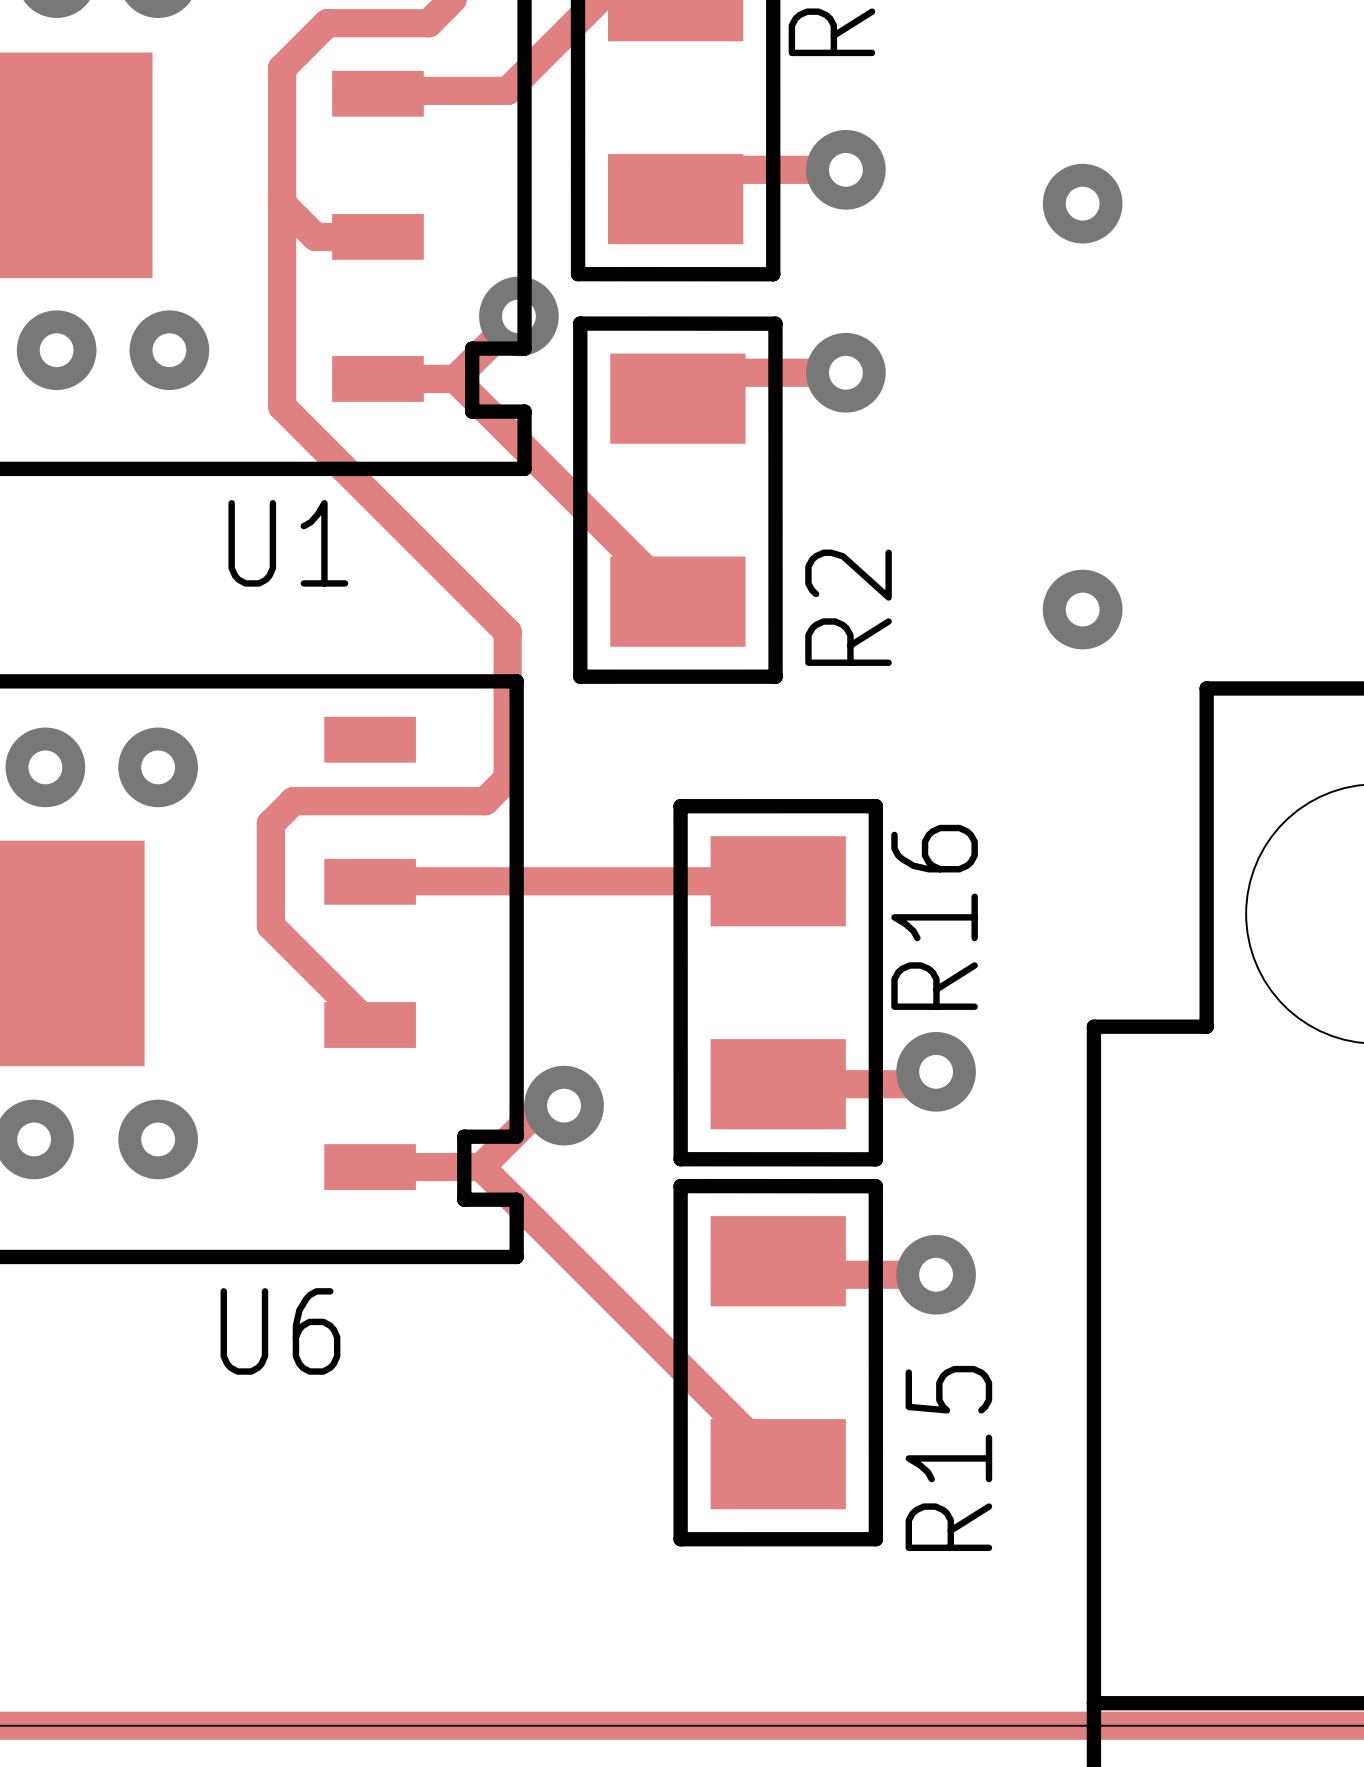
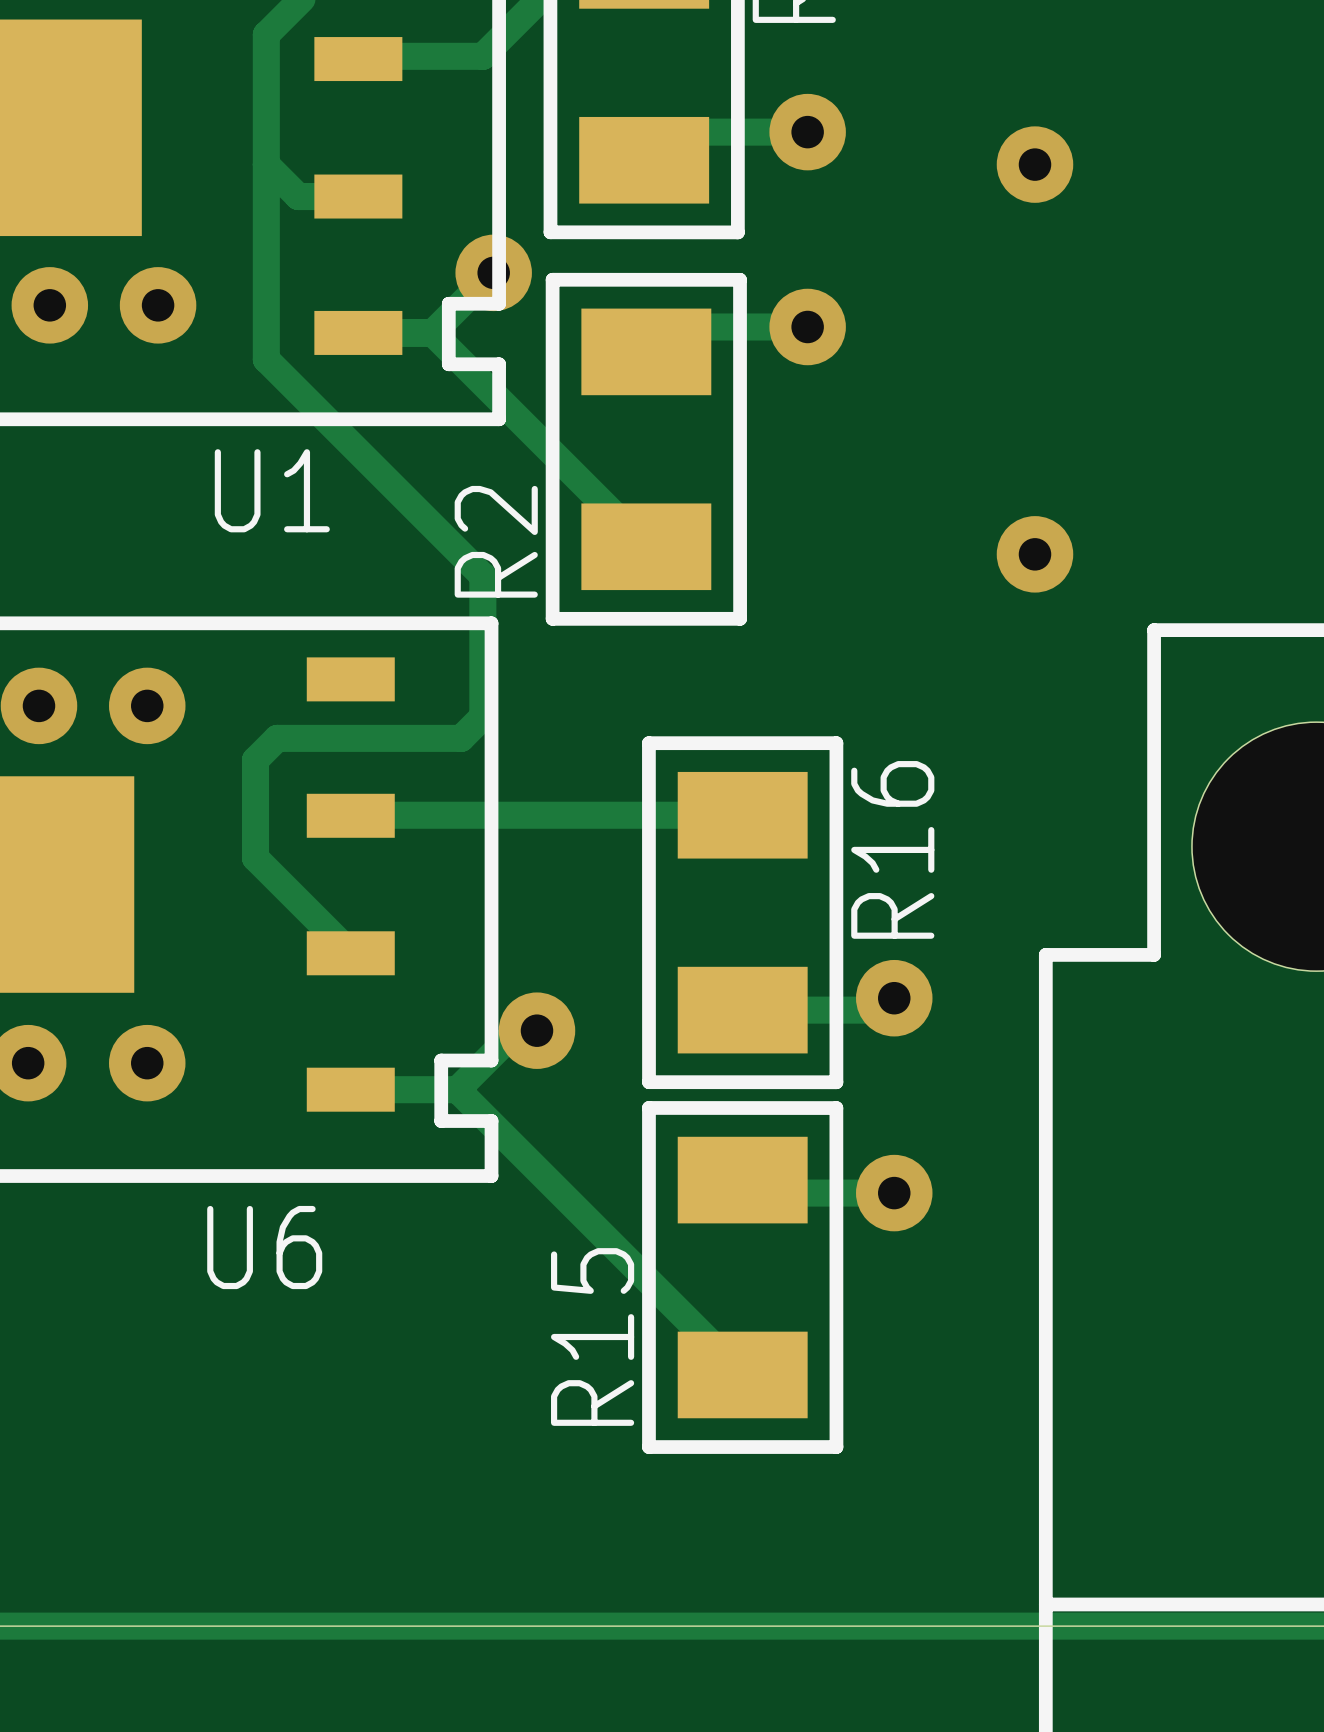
R2 name position: R2 (848, 607) -> R2 (496, 541)
R15 name position: R15 (948, 1458) -> R15 (592, 1337)

